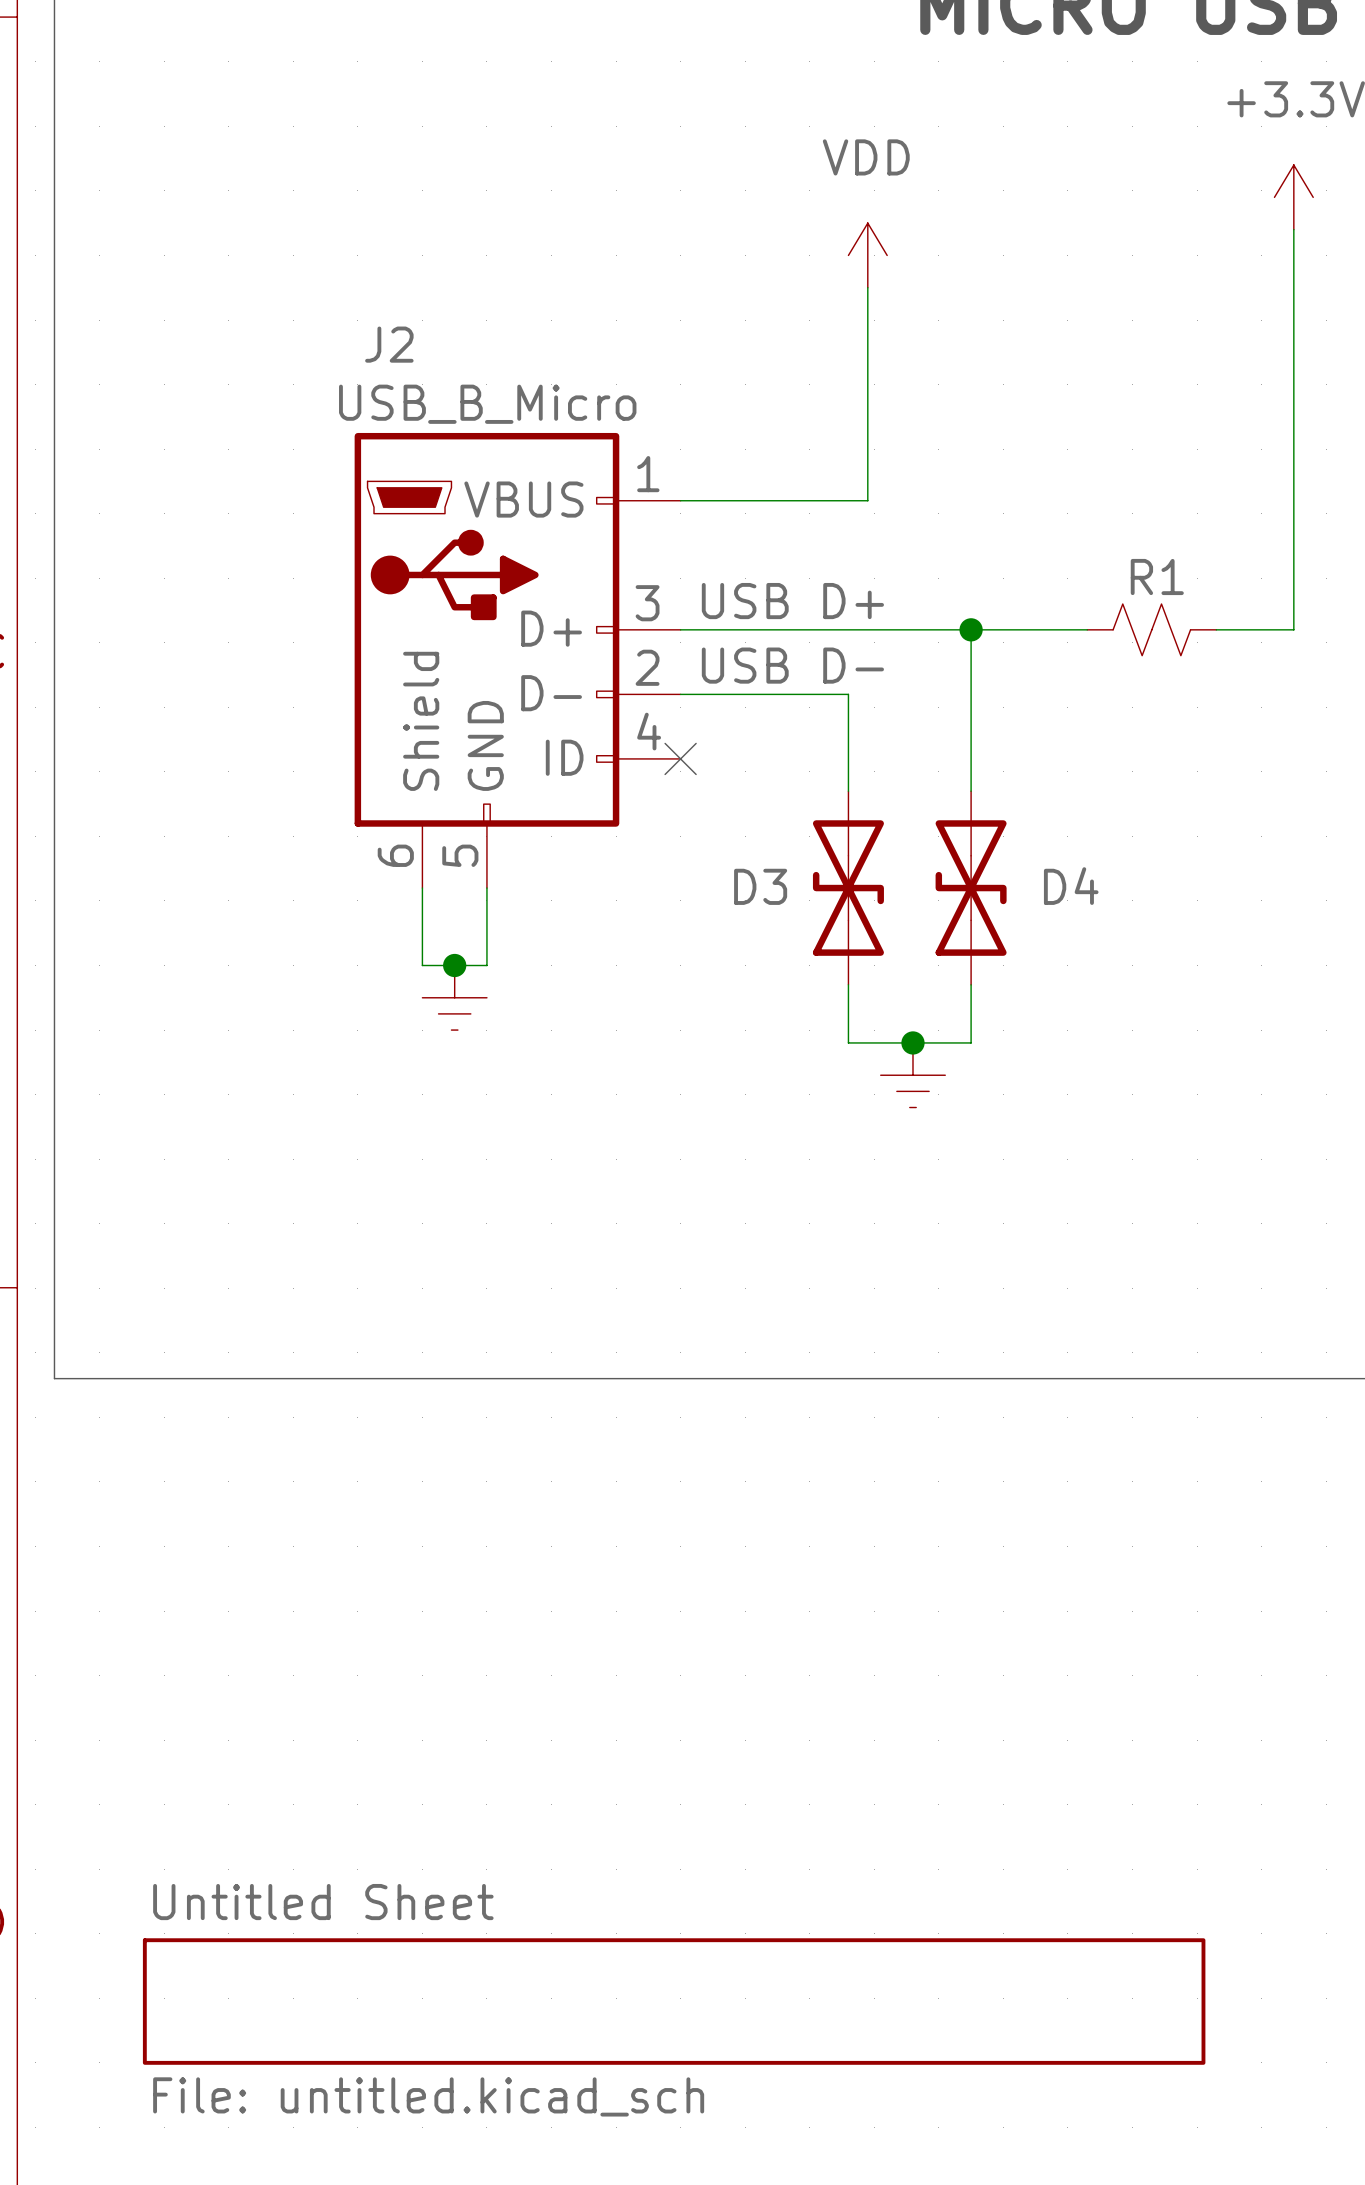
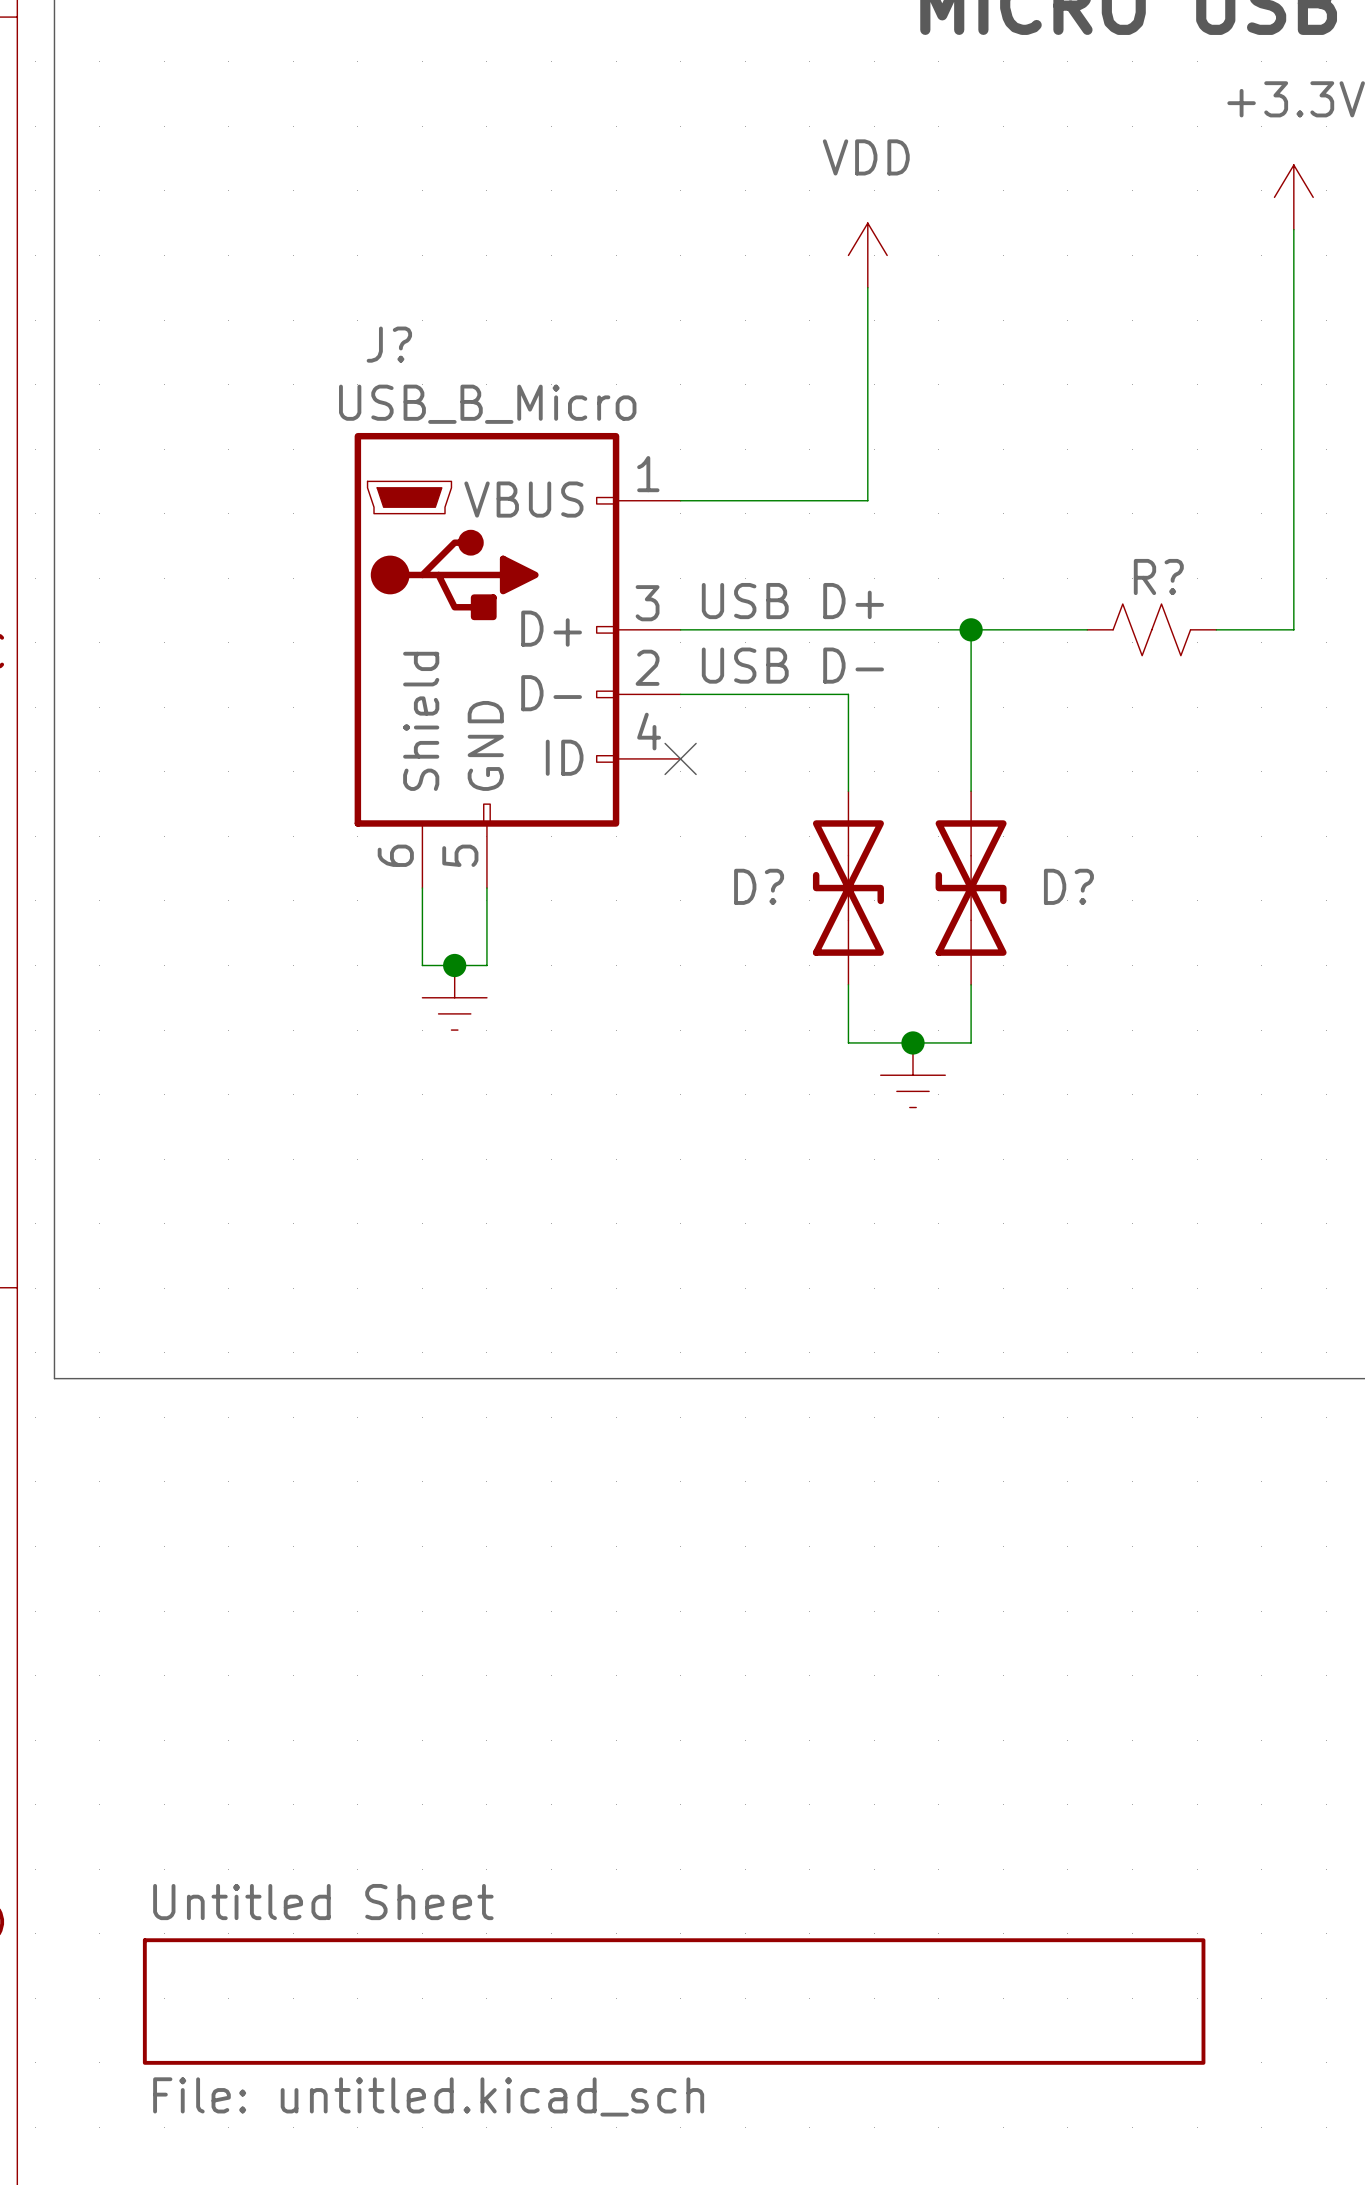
J2 name: J2 (389, 344) -> J? (389, 344)
R1 name: R1 (1157, 576) -> R? (1158, 576)
D3 name: D3 (760, 886) -> D? (759, 886)
D4 name: D4 (1071, 886) -> D? (1068, 886)

